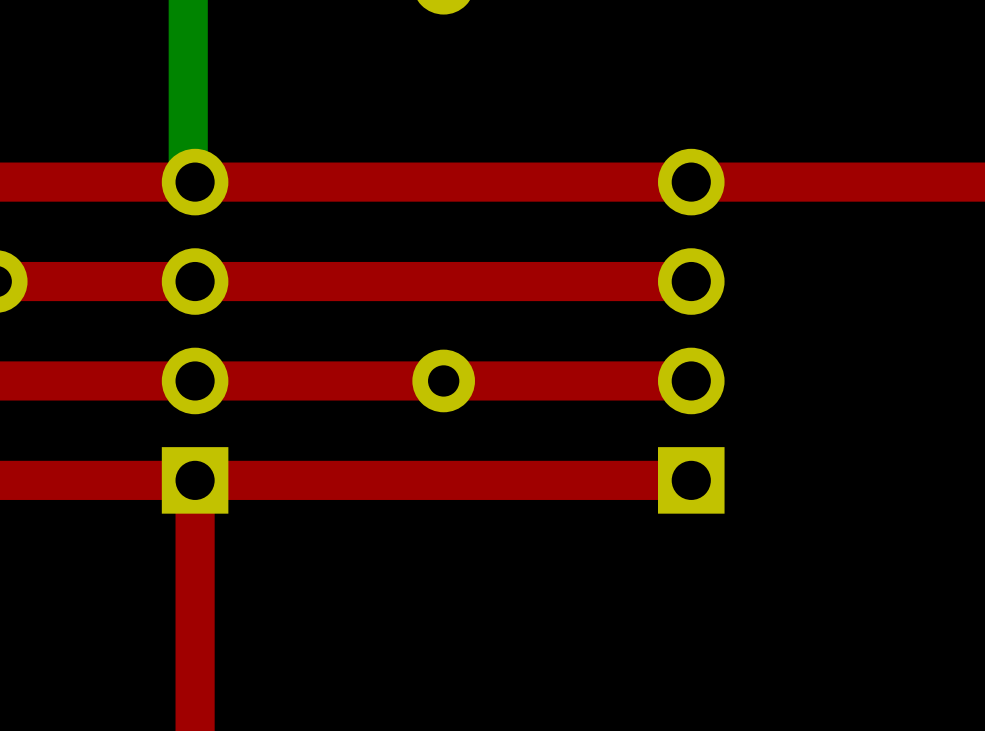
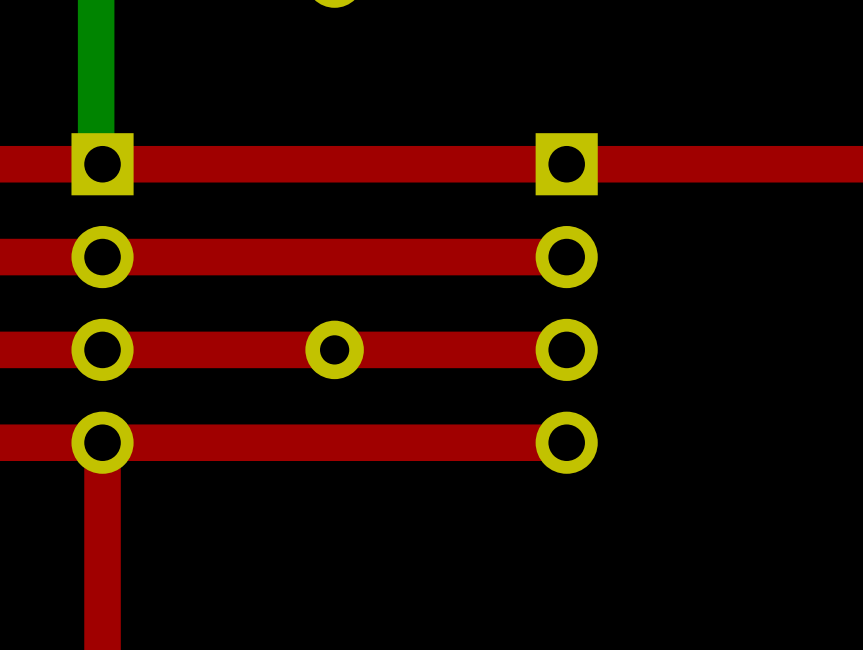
part rotation: 0° (195, 331) -> 180° (102, 303)
part rotation: 0° (691, 331) -> 180° (566, 303)

